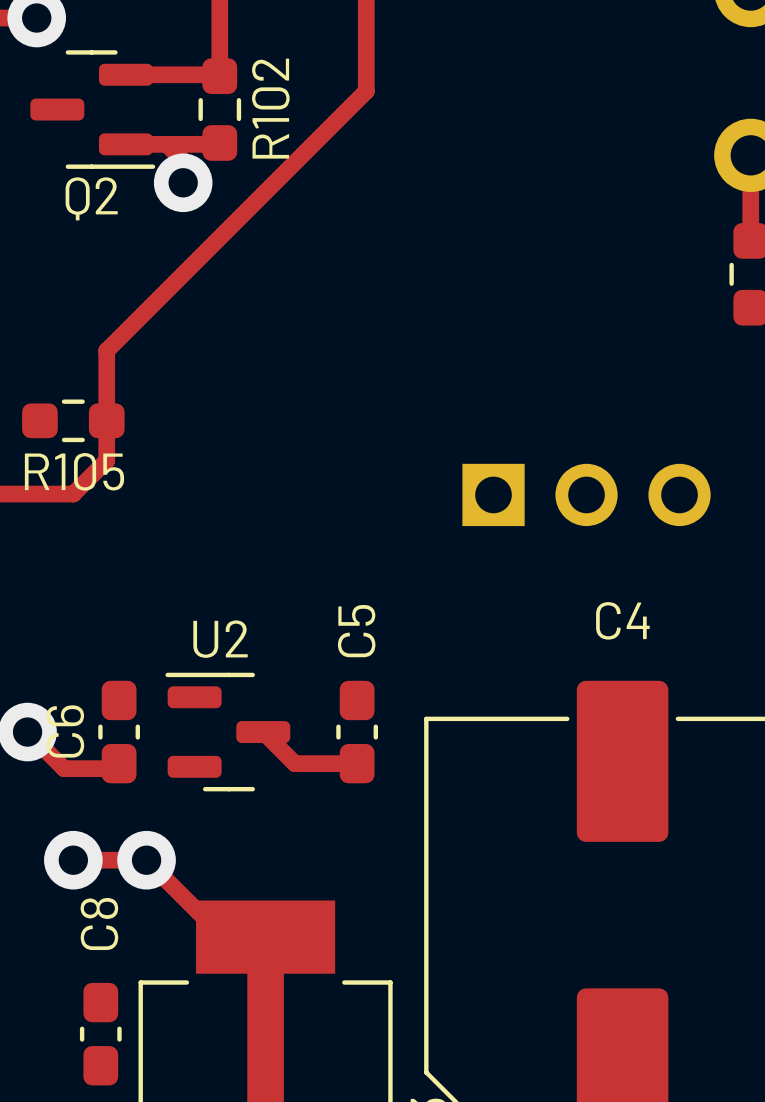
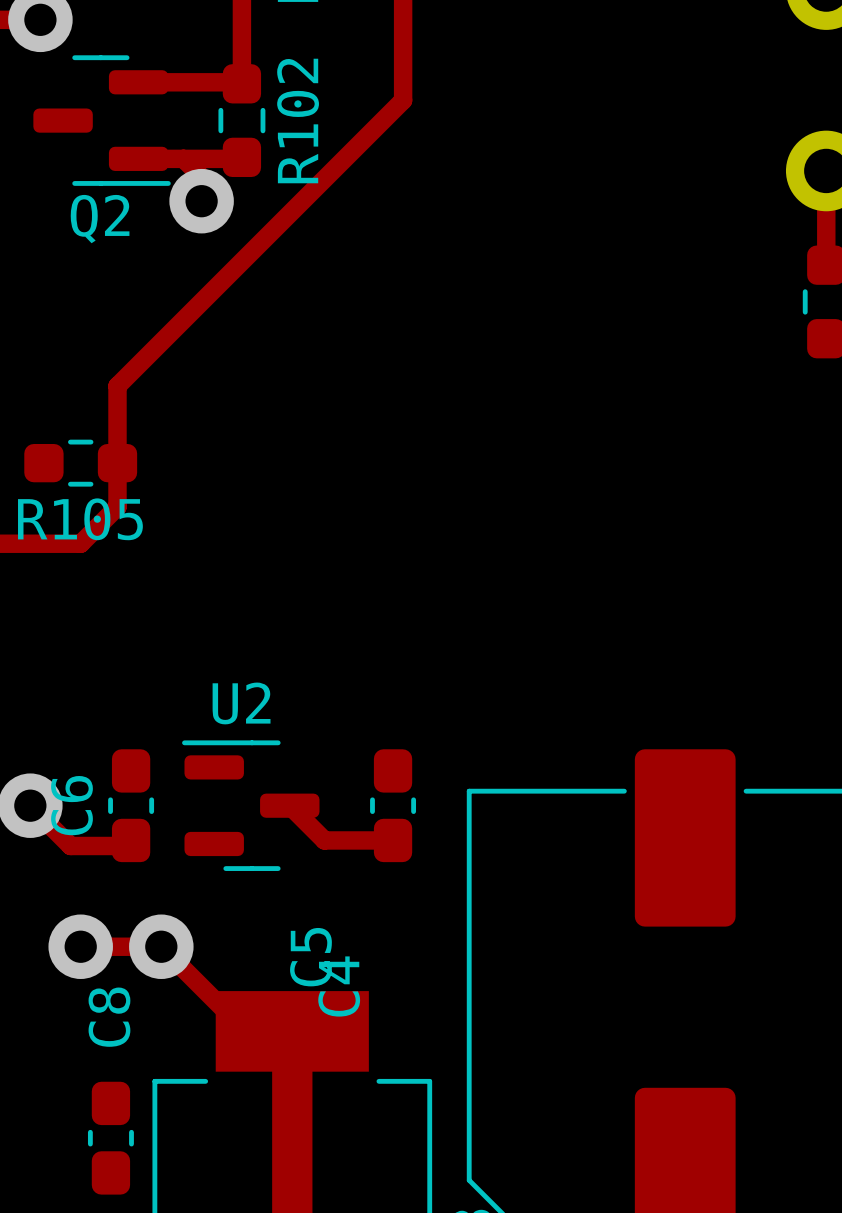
part: (586, 494) -> none
C4 name rotation: 0° (622, 620) -> 90° counterclockwise (339, 986)
C4 name position: C4 (622, 620) -> C4 (339, 986)
C5 name position: C5 (356, 631) -> C5 (310, 957)

